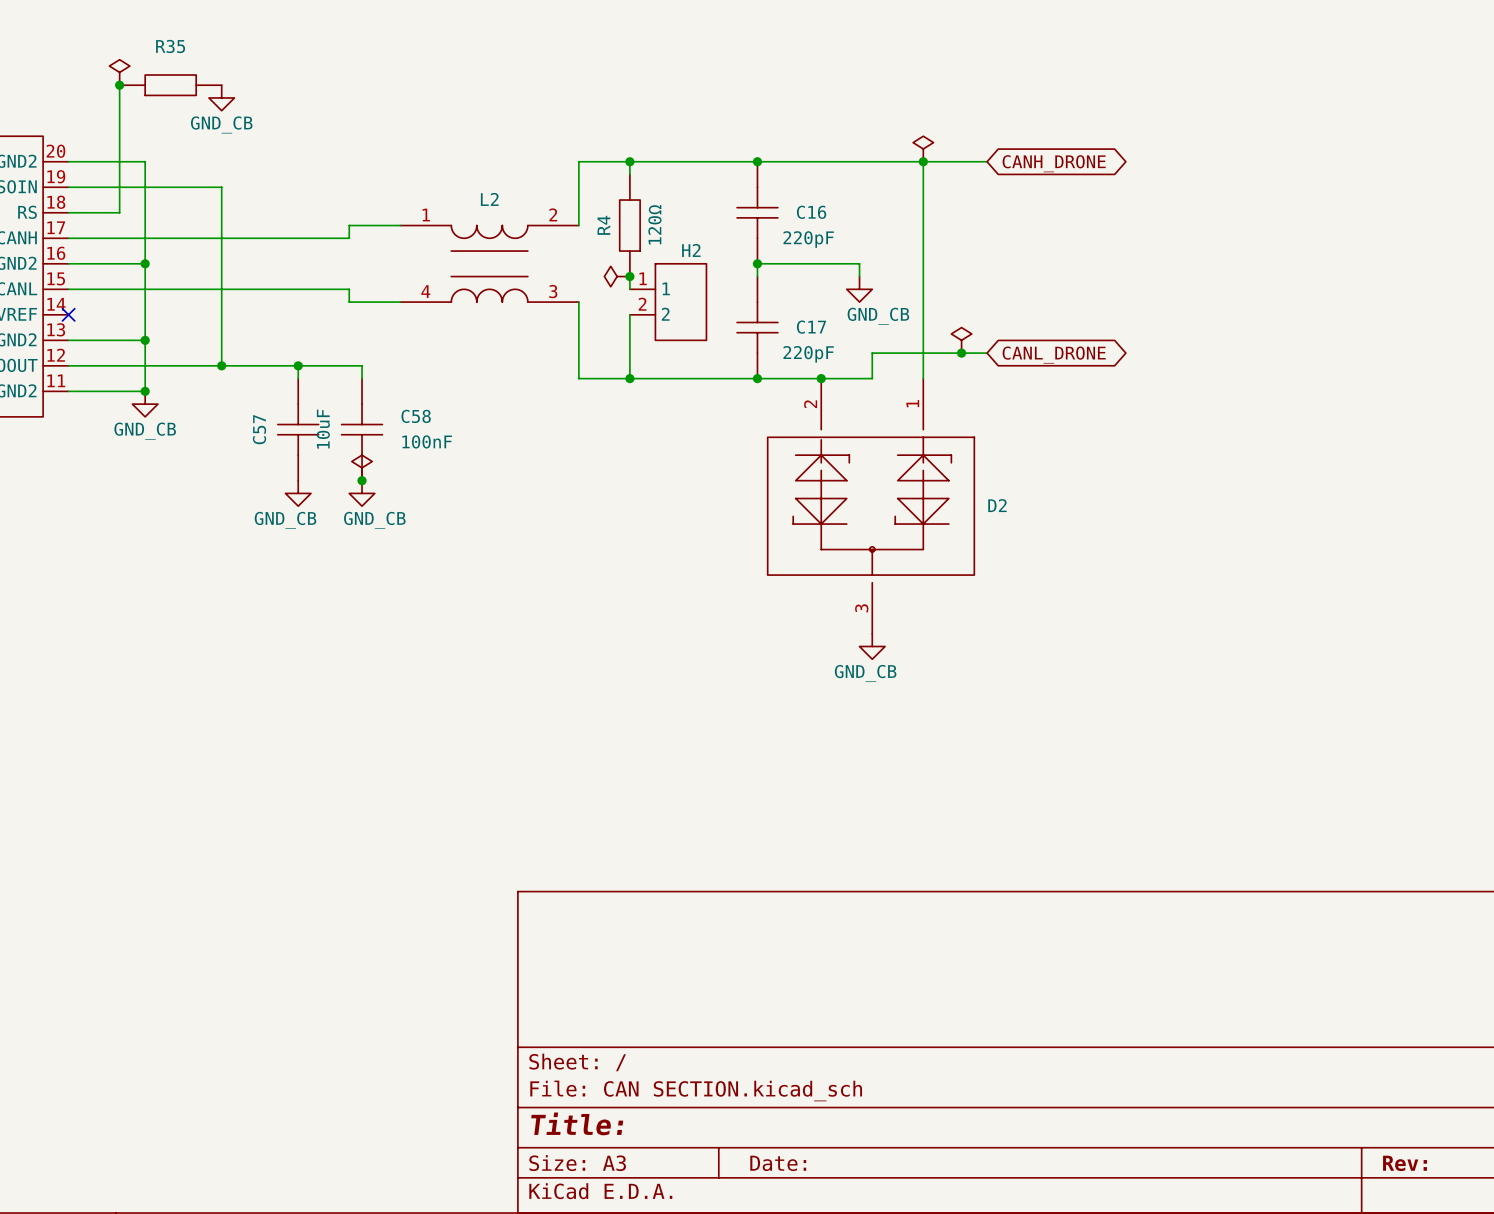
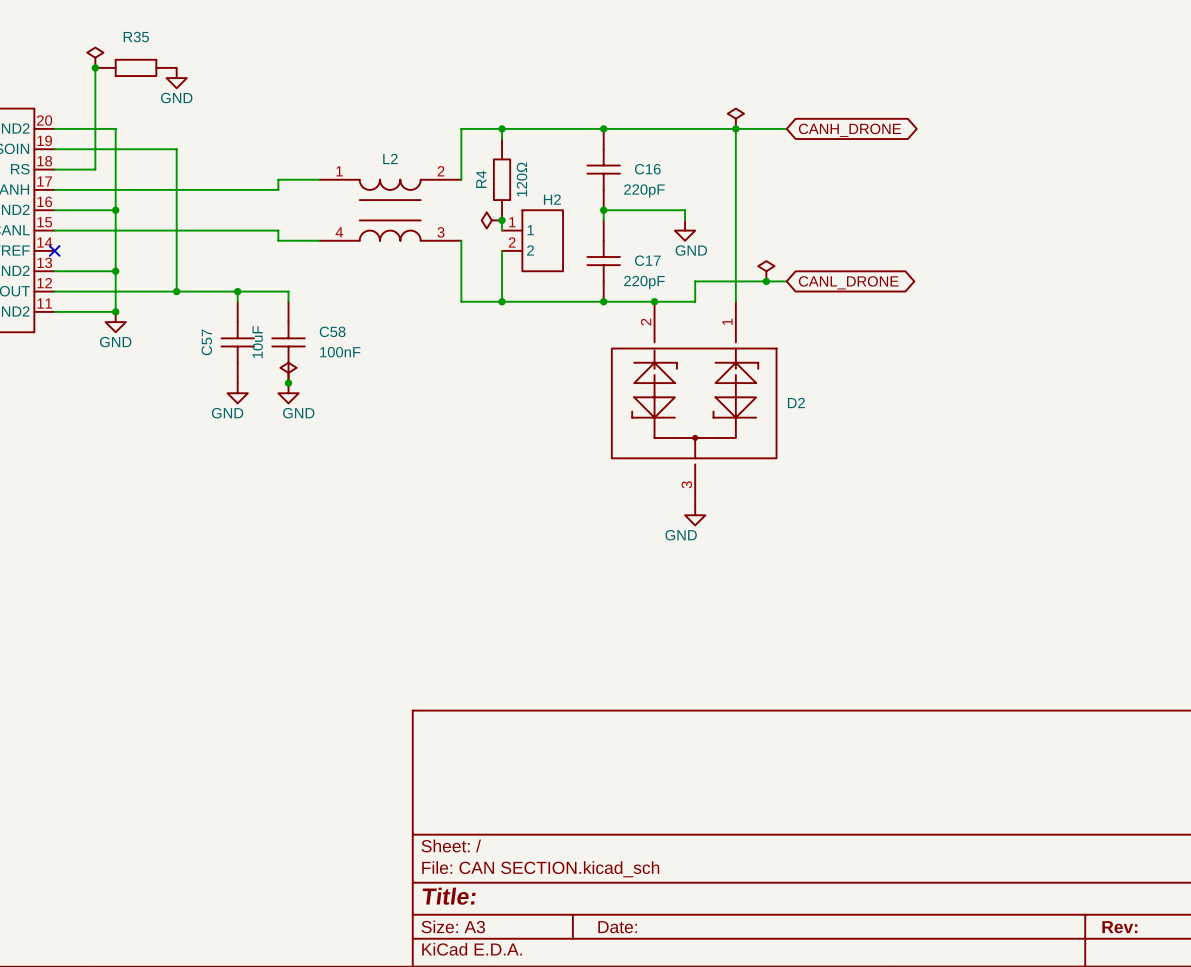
power symbol: GND_CB (221, 97) -> GND (176, 78)
power symbol: GND_CB (859, 289) -> GND (685, 230)
power symbol: GND_CB (145, 404) -> GND (115, 322)
power symbol: GND_CB (298, 493) -> GND (237, 393)
power symbol: GND_CB (362, 493) -> GND (288, 393)
power symbol: GND_CB (872, 646) -> GND (695, 515)

